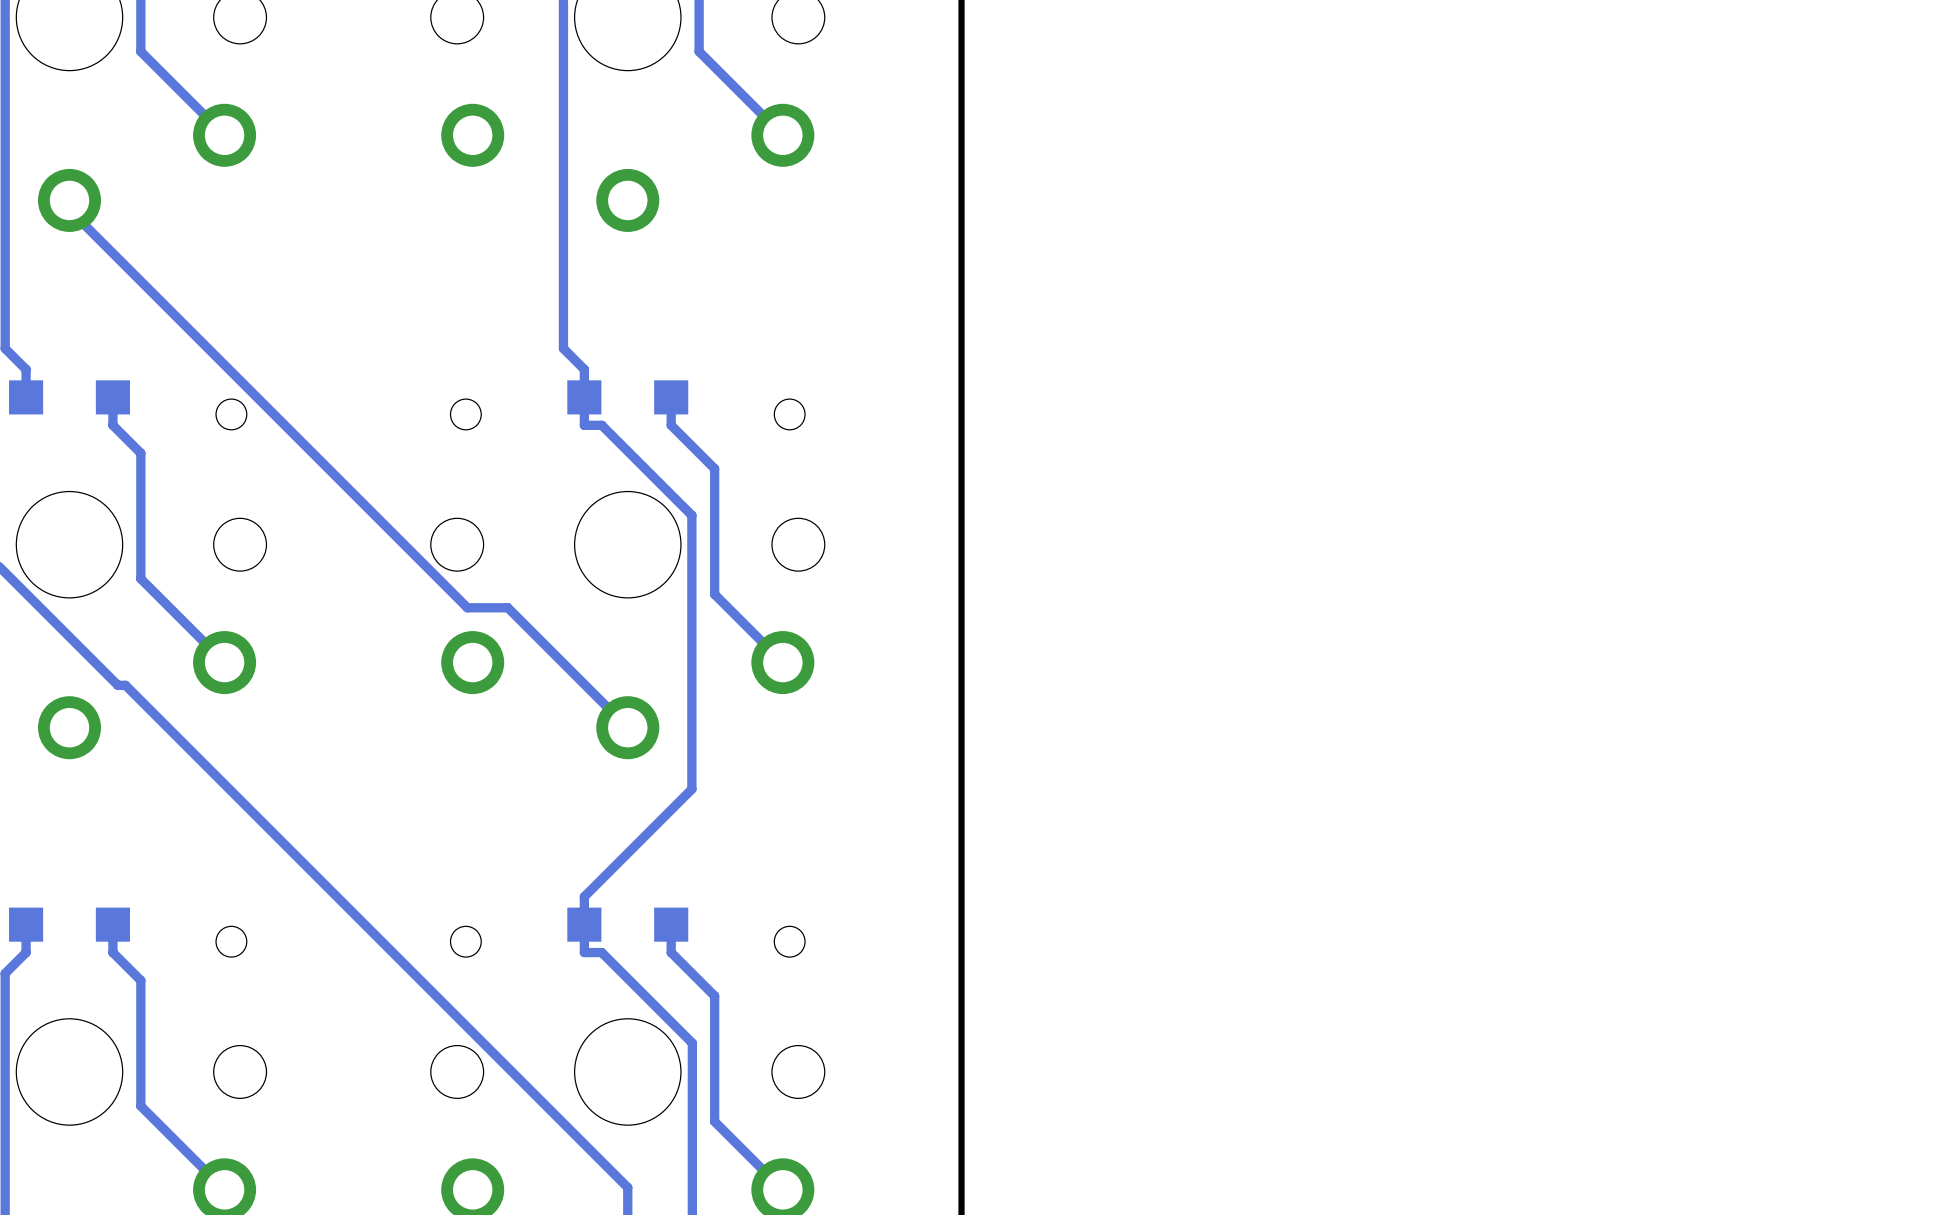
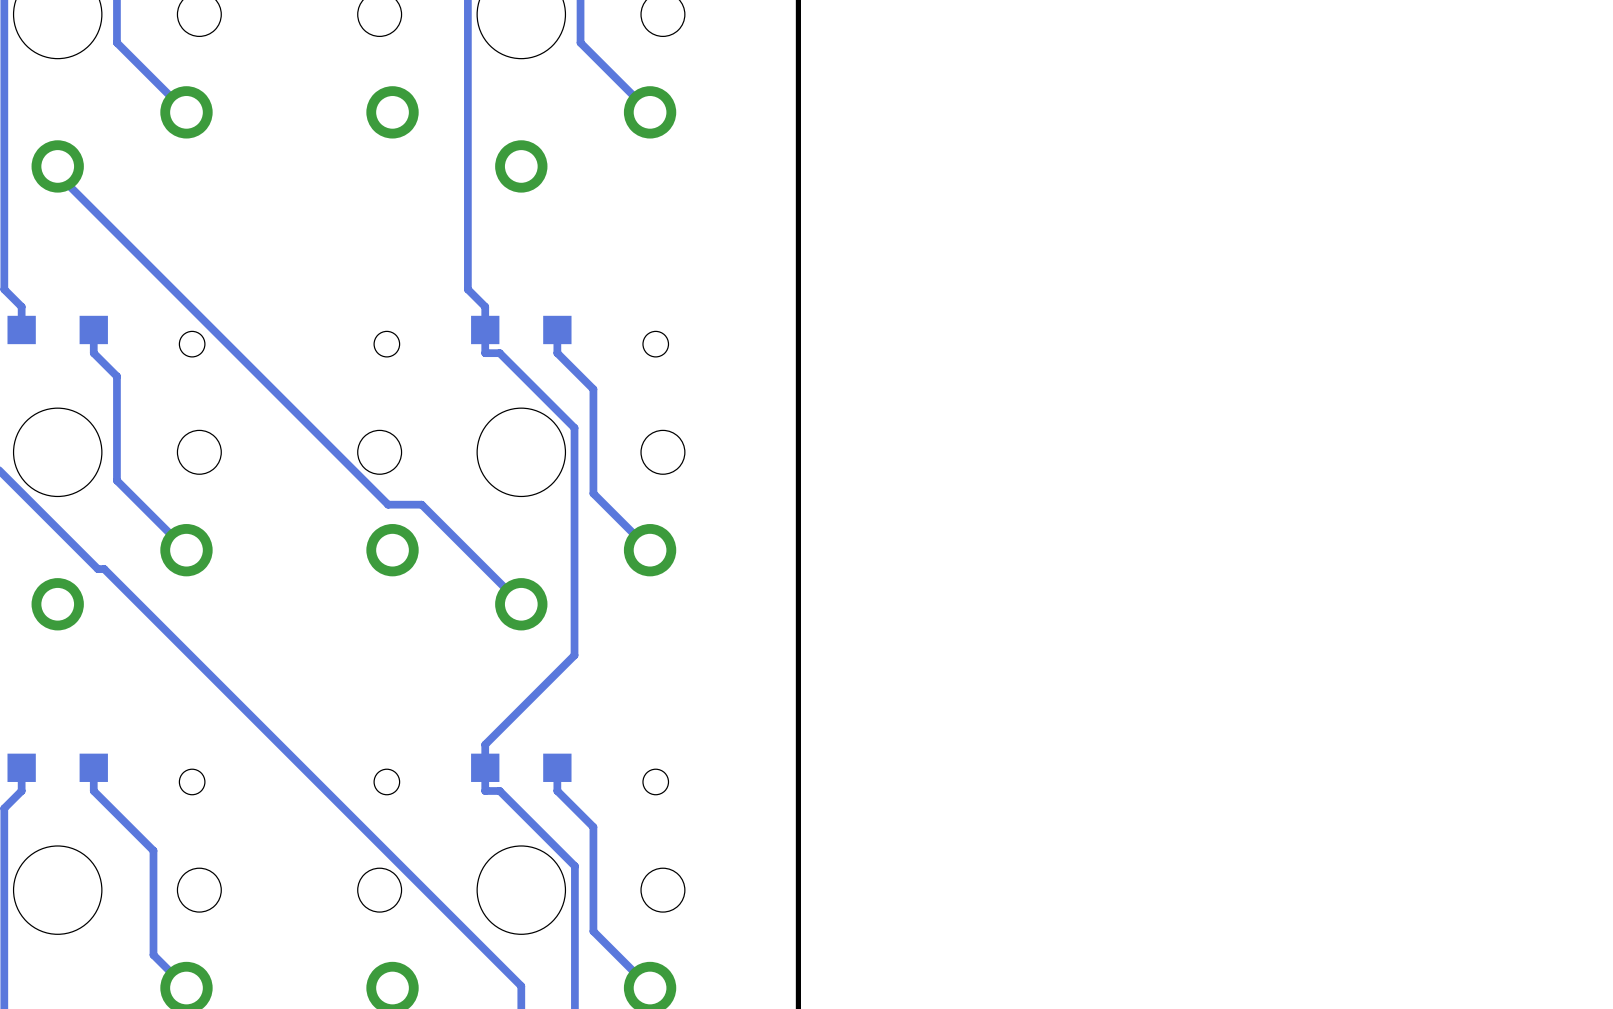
track: (140, 980) (140, 1106) (184, 1150) -> (116, 814) (153, 850) (153, 955)

